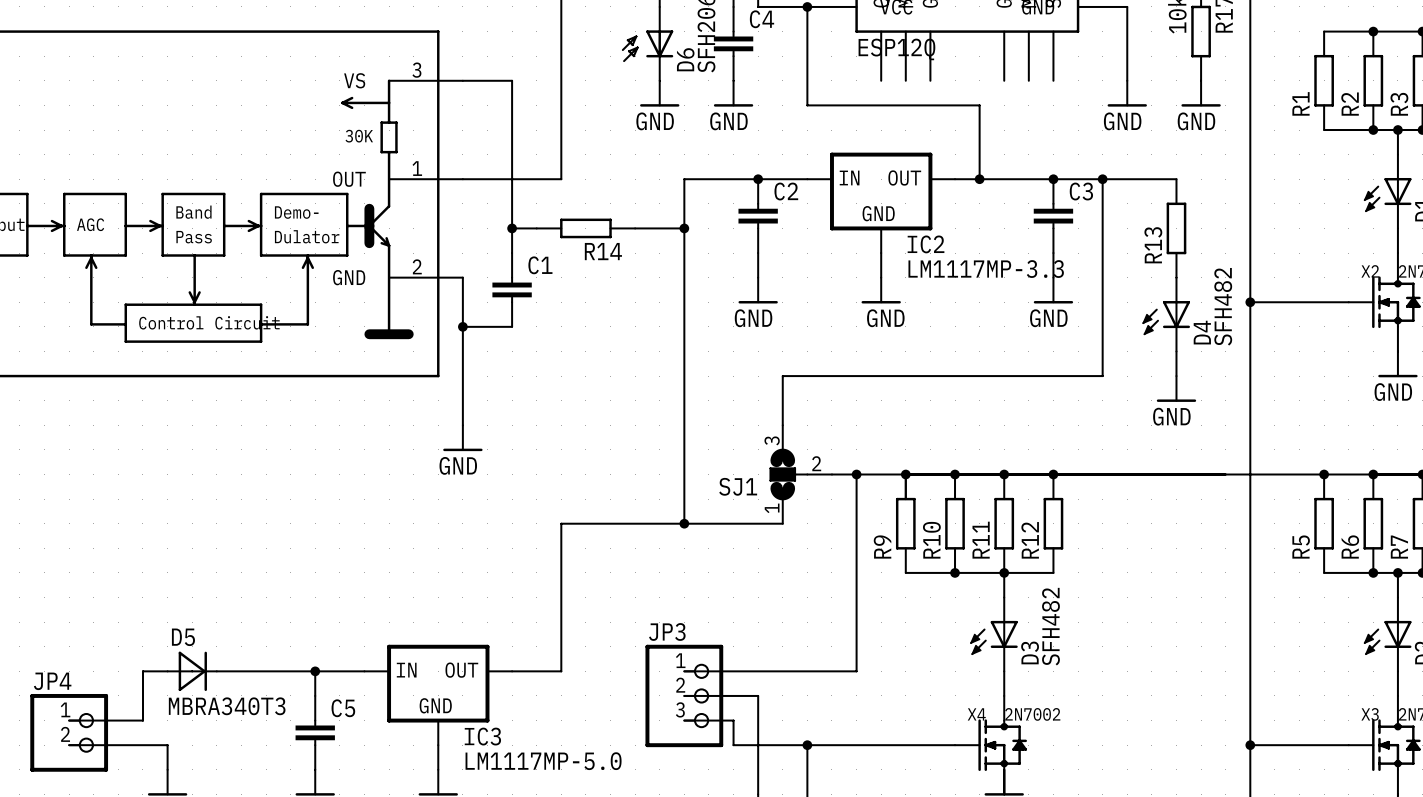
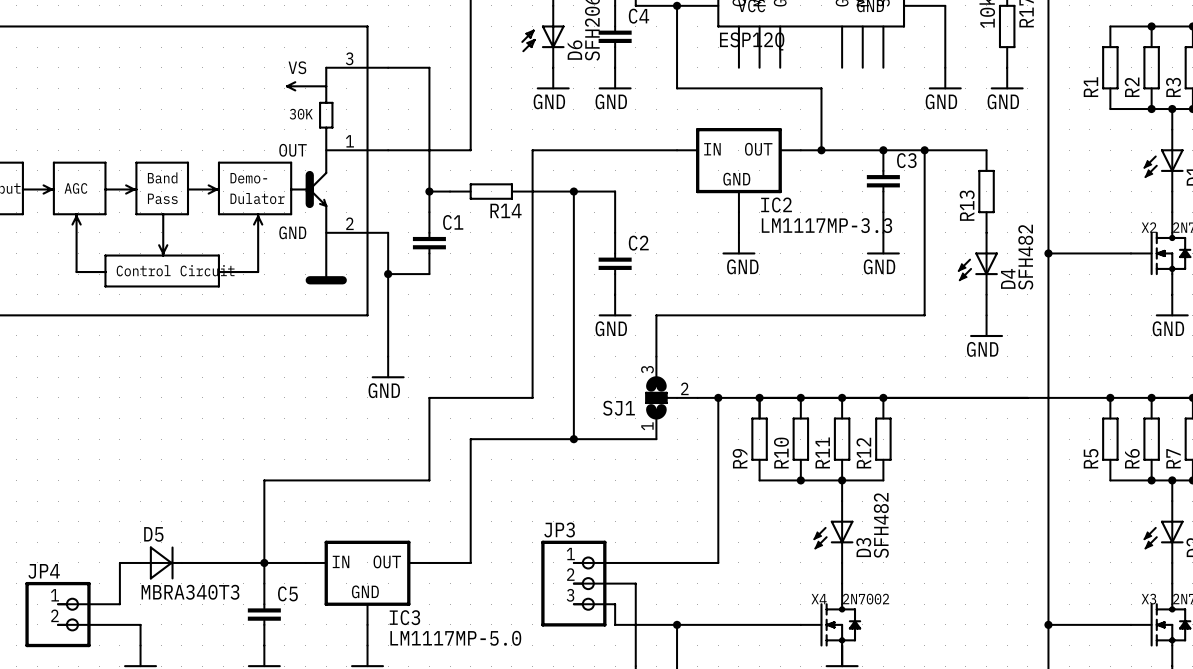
wire: (684, 179) (684, 228) -> (615, 232) (615, 191) (573, 191)
wire: none -> (573, 150) (532, 150) (532, 397) (429, 397) (429, 480) (264, 480) (264, 562)
junction: (758, 179) -> none
C2 position: (758, 216) -> (615, 263)
wire: (758, 253) (758, 277) -> none
power symbol position: GND (758, 290) -> GND (615, 305)

